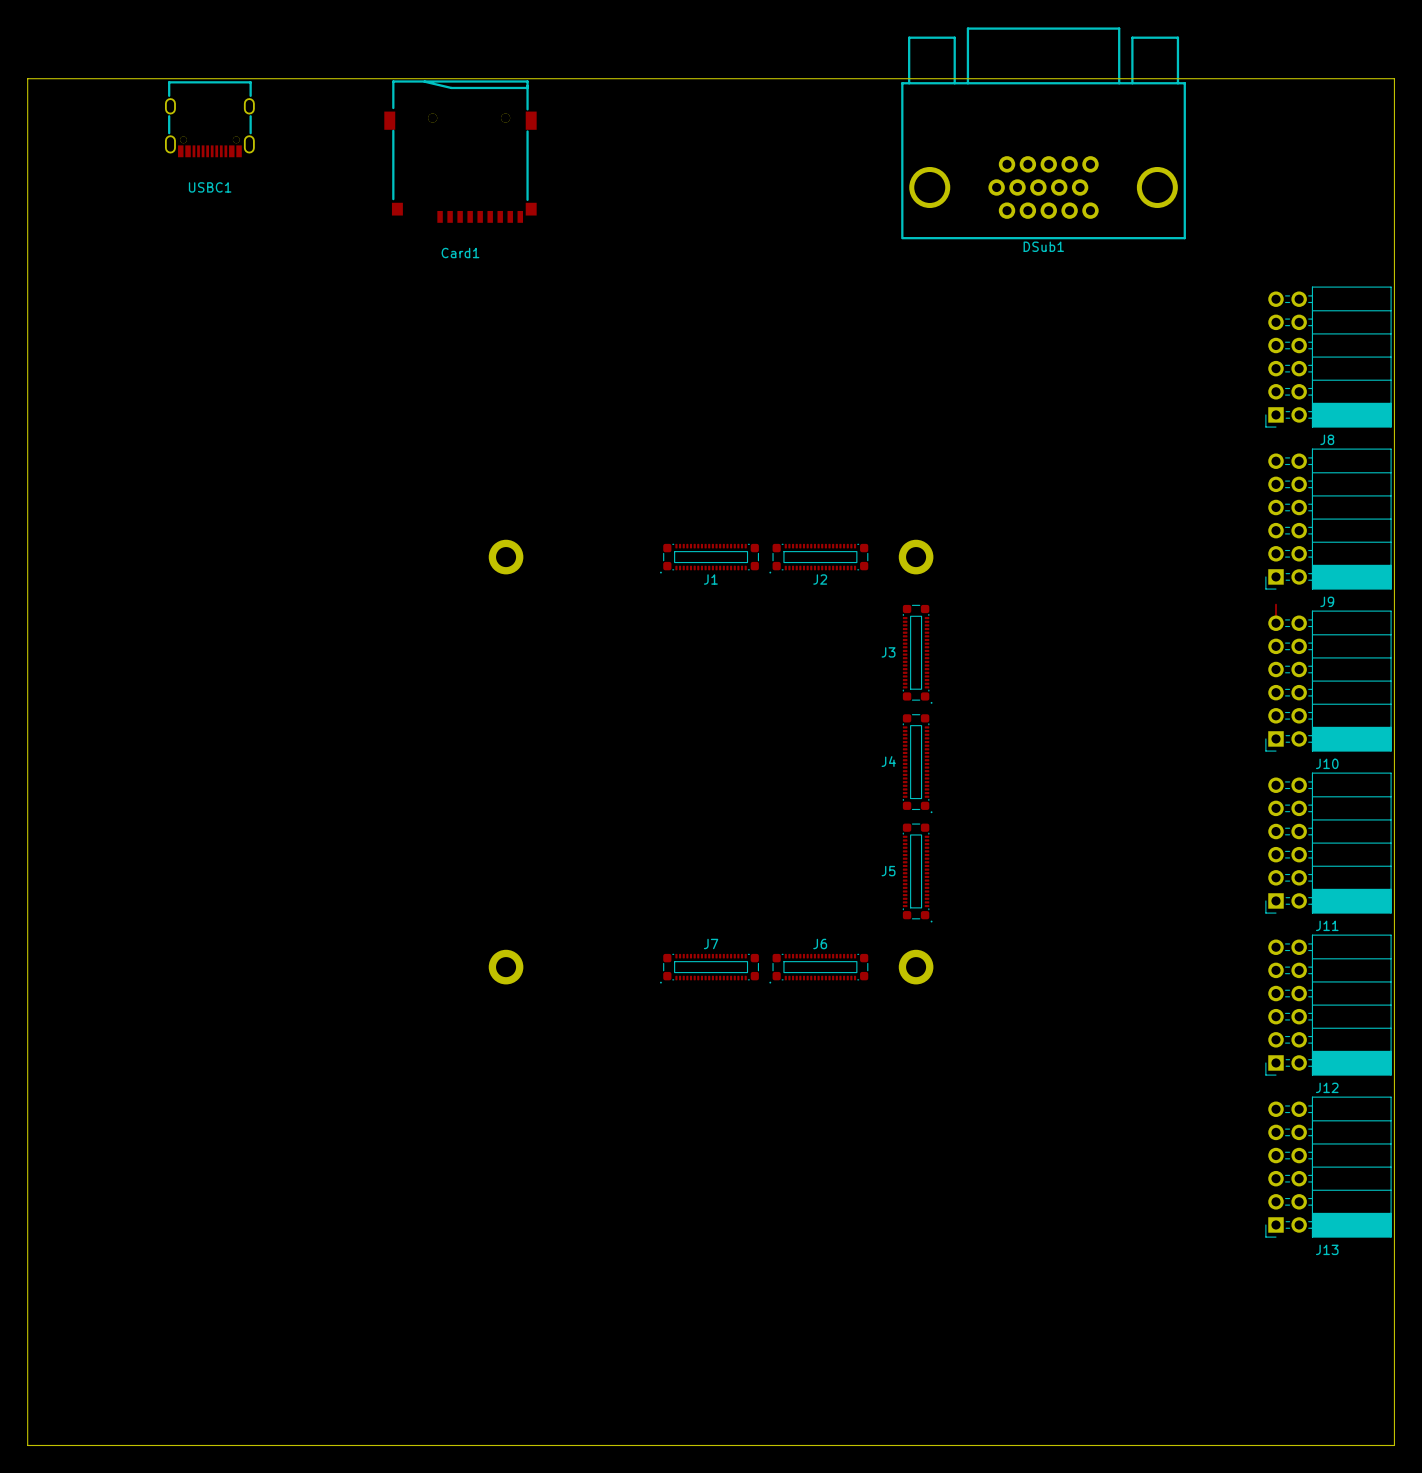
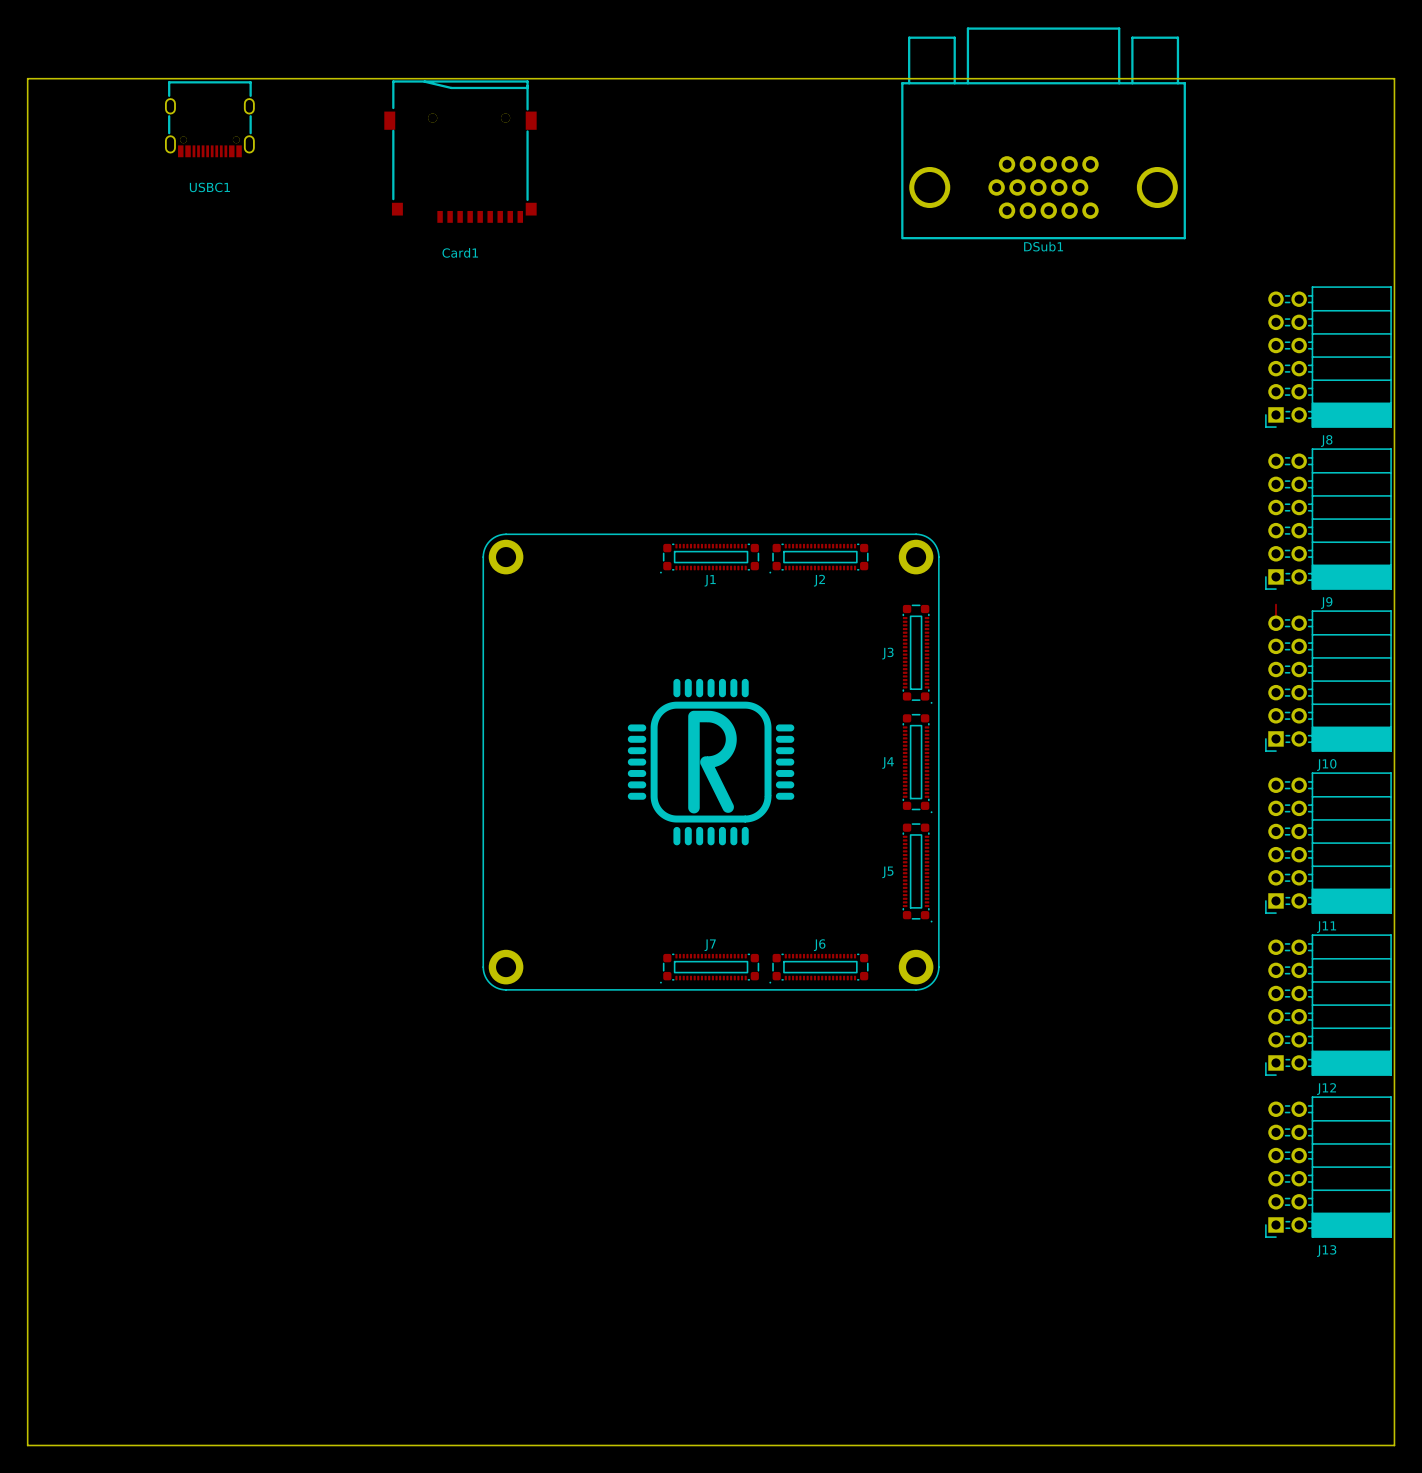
line: none -> (506, 534) (916, 534) (925, 536) (932, 540) (936, 547) (938, 557) (938, 967) (937, 974) (932, 983) (925, 987) (916, 989) (506, 989) (496, 987) (489, 983) (484, 974) (483, 967) (483, 557) (485, 547) (489, 540) (496, 536) (506, 534)
drawing: none -> [627, 678, 795, 846]

